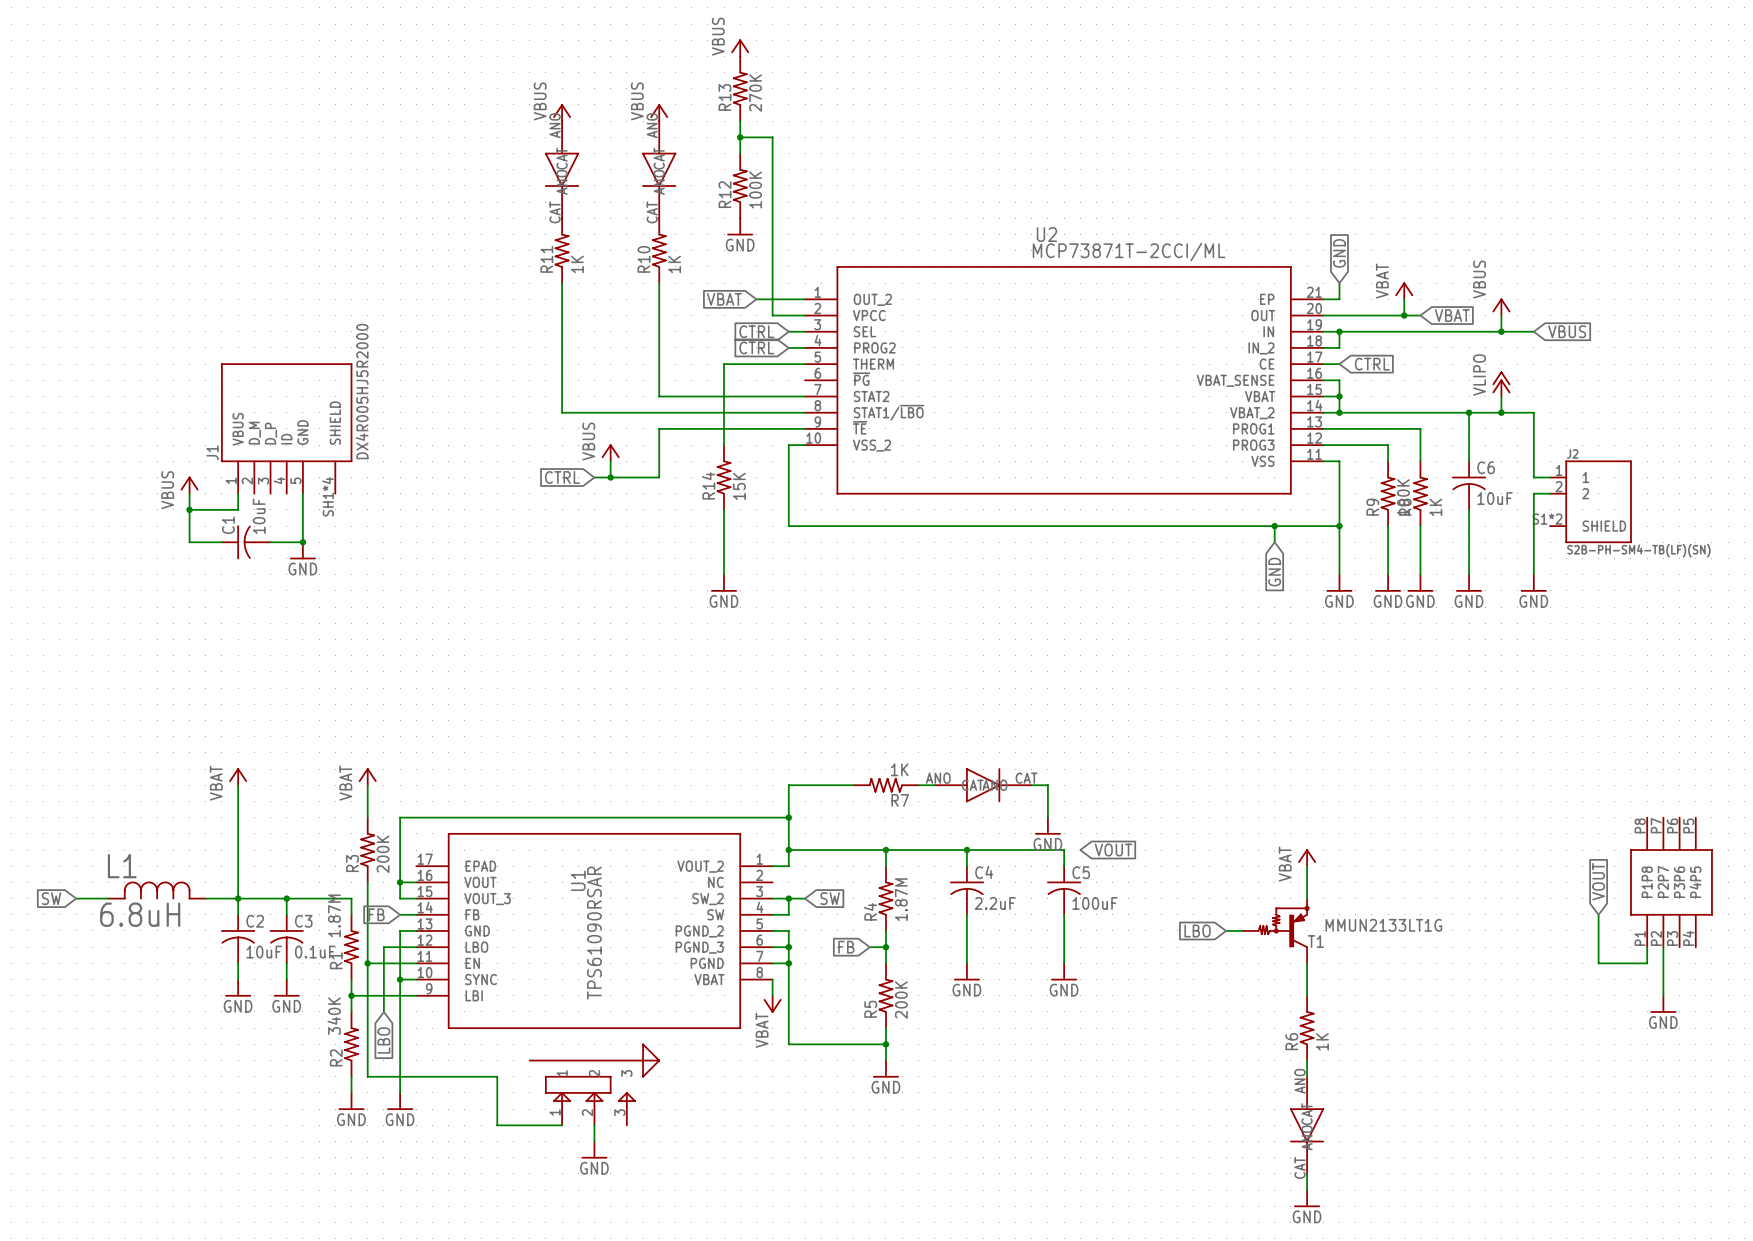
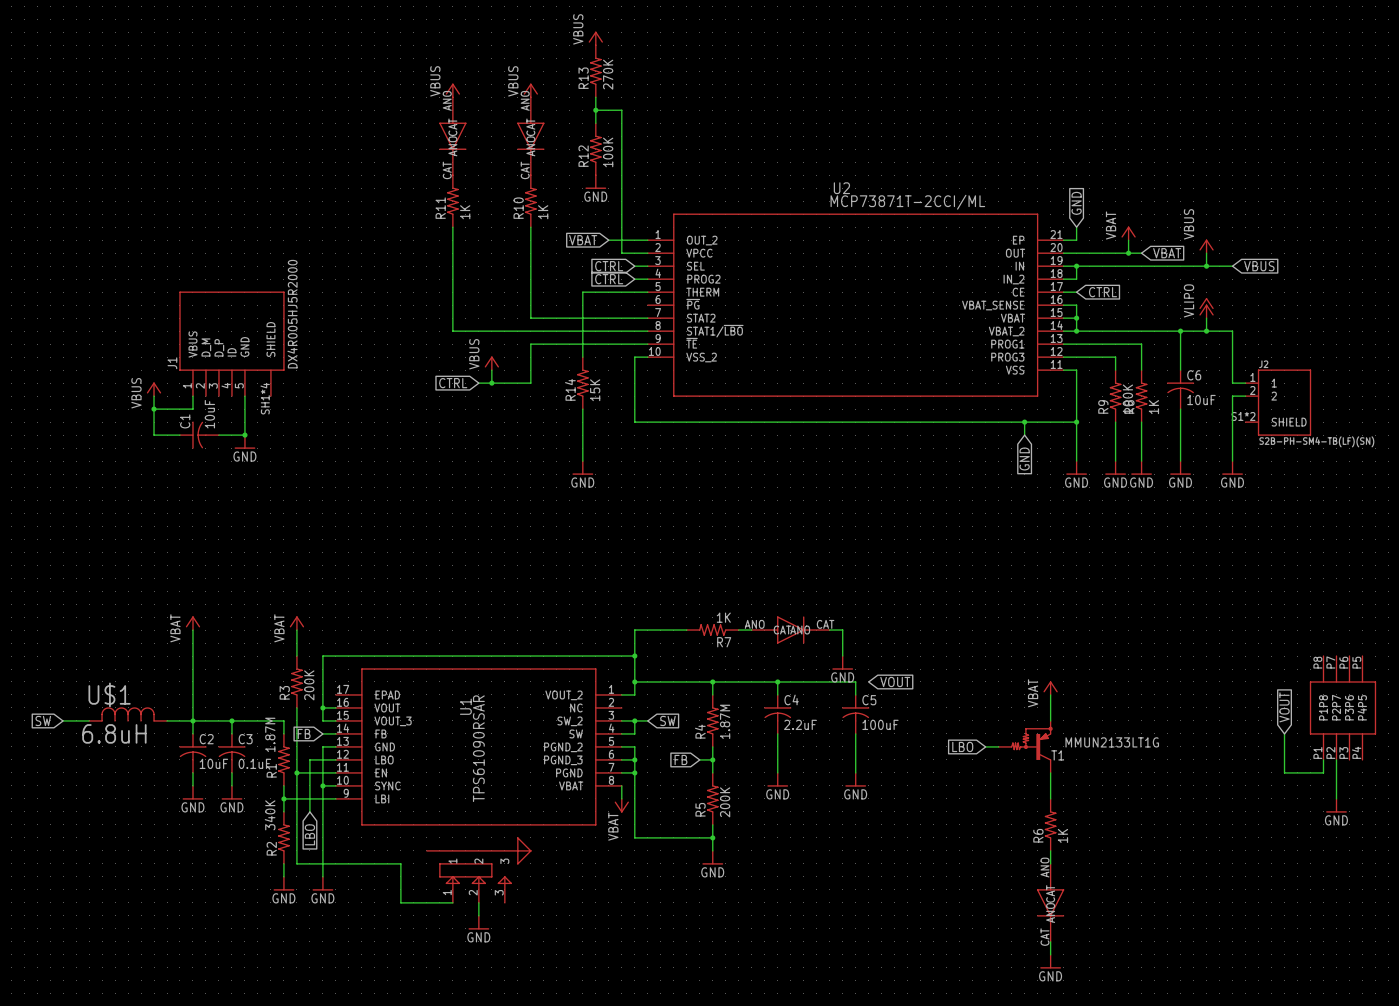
L1 name: L1 (122, 866) -> U$1 (109, 694)

